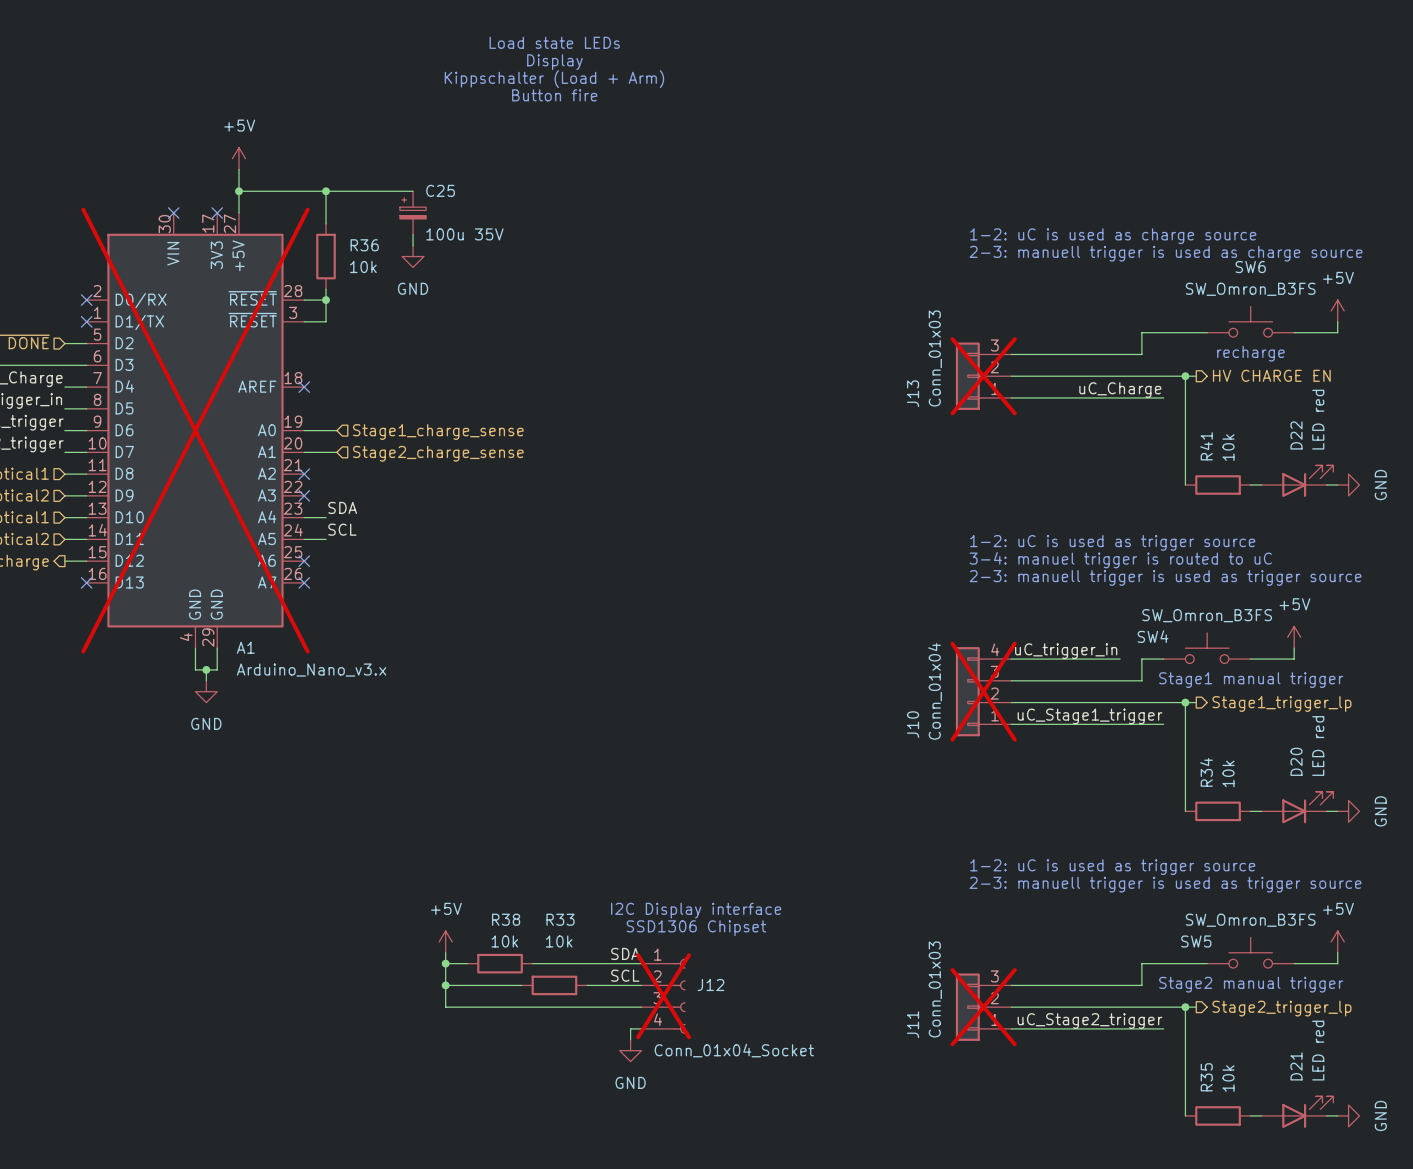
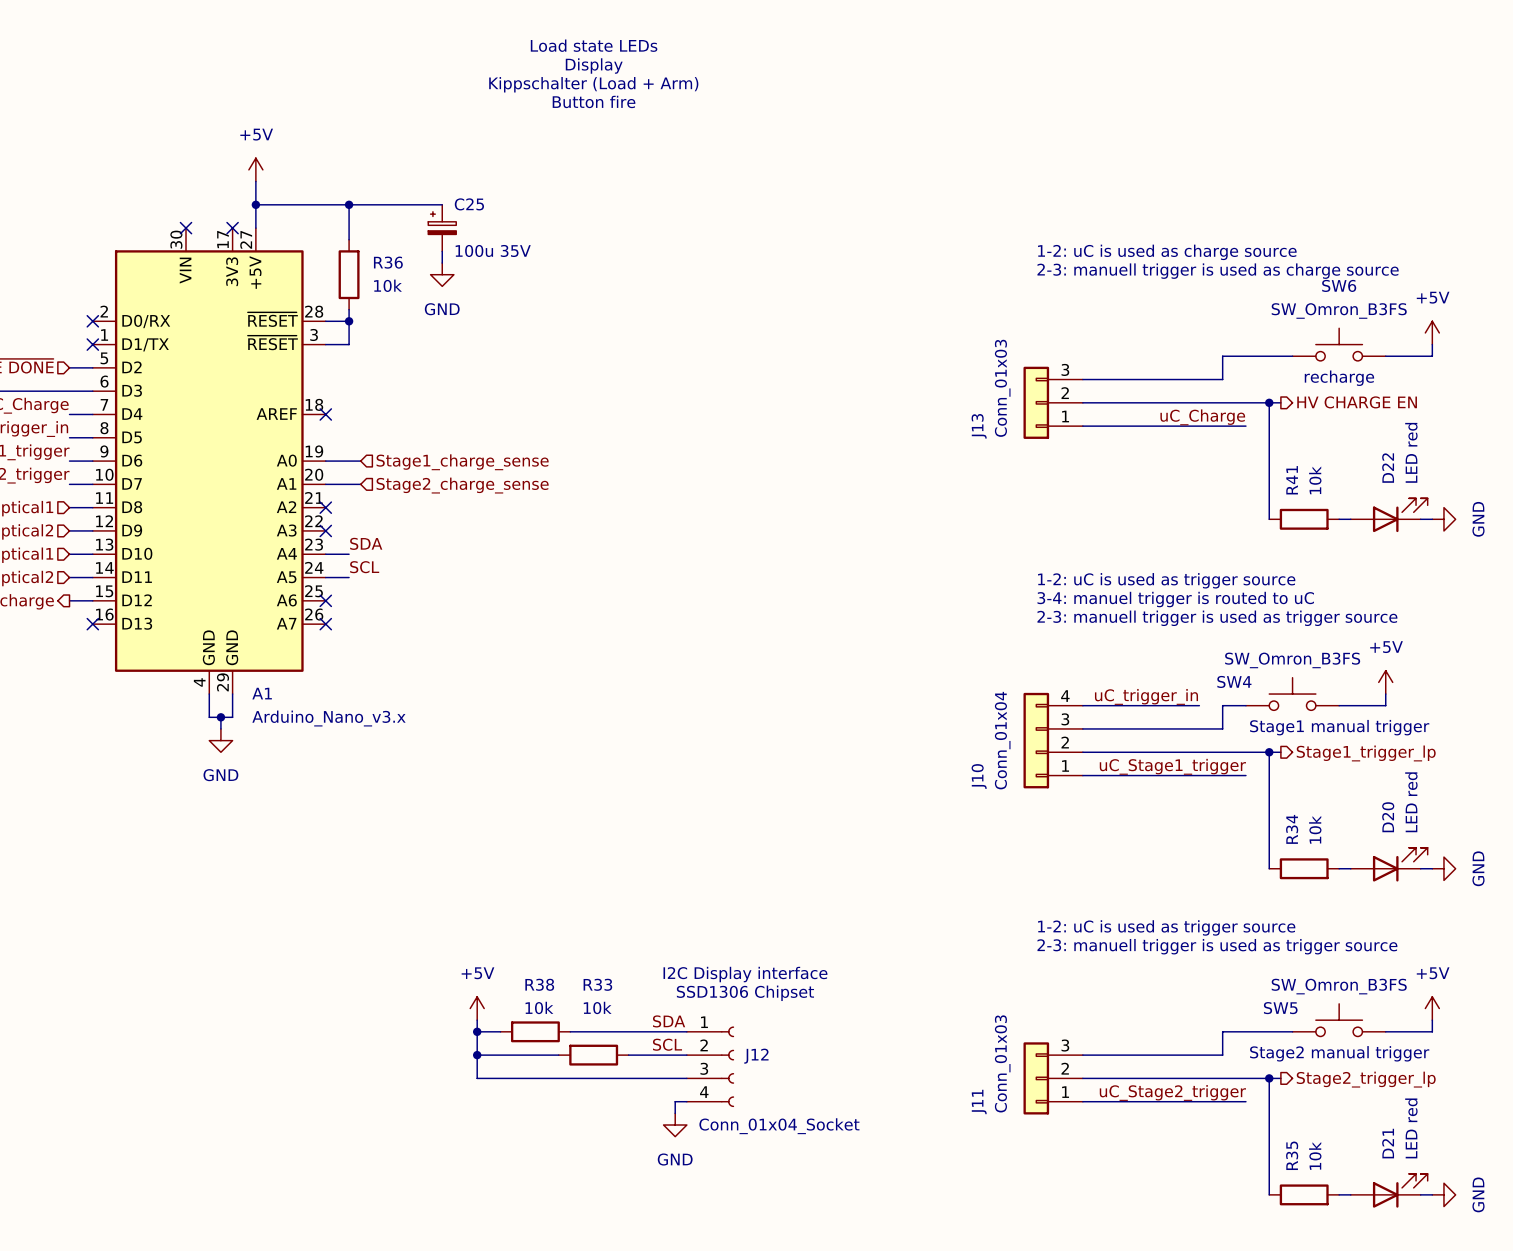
J13 do-not-place cross: (983, 376) -> none
A1 do-not-place cross: (195, 430) -> none
J10 do-not-place cross: (983, 691) -> none
J12 do-not-place cross: (663, 996) -> none
J11 do-not-place cross: (983, 1007) -> none

